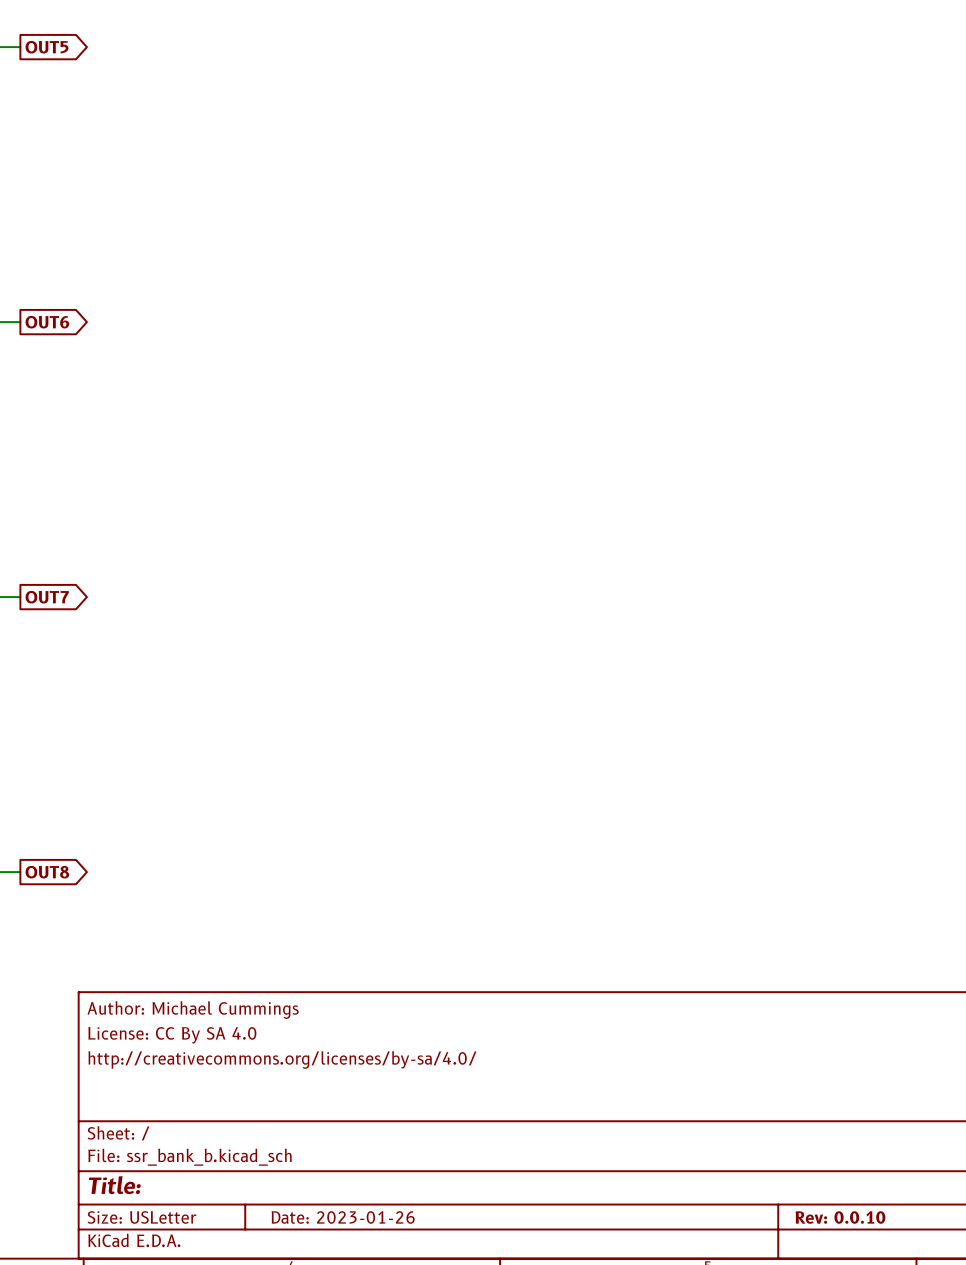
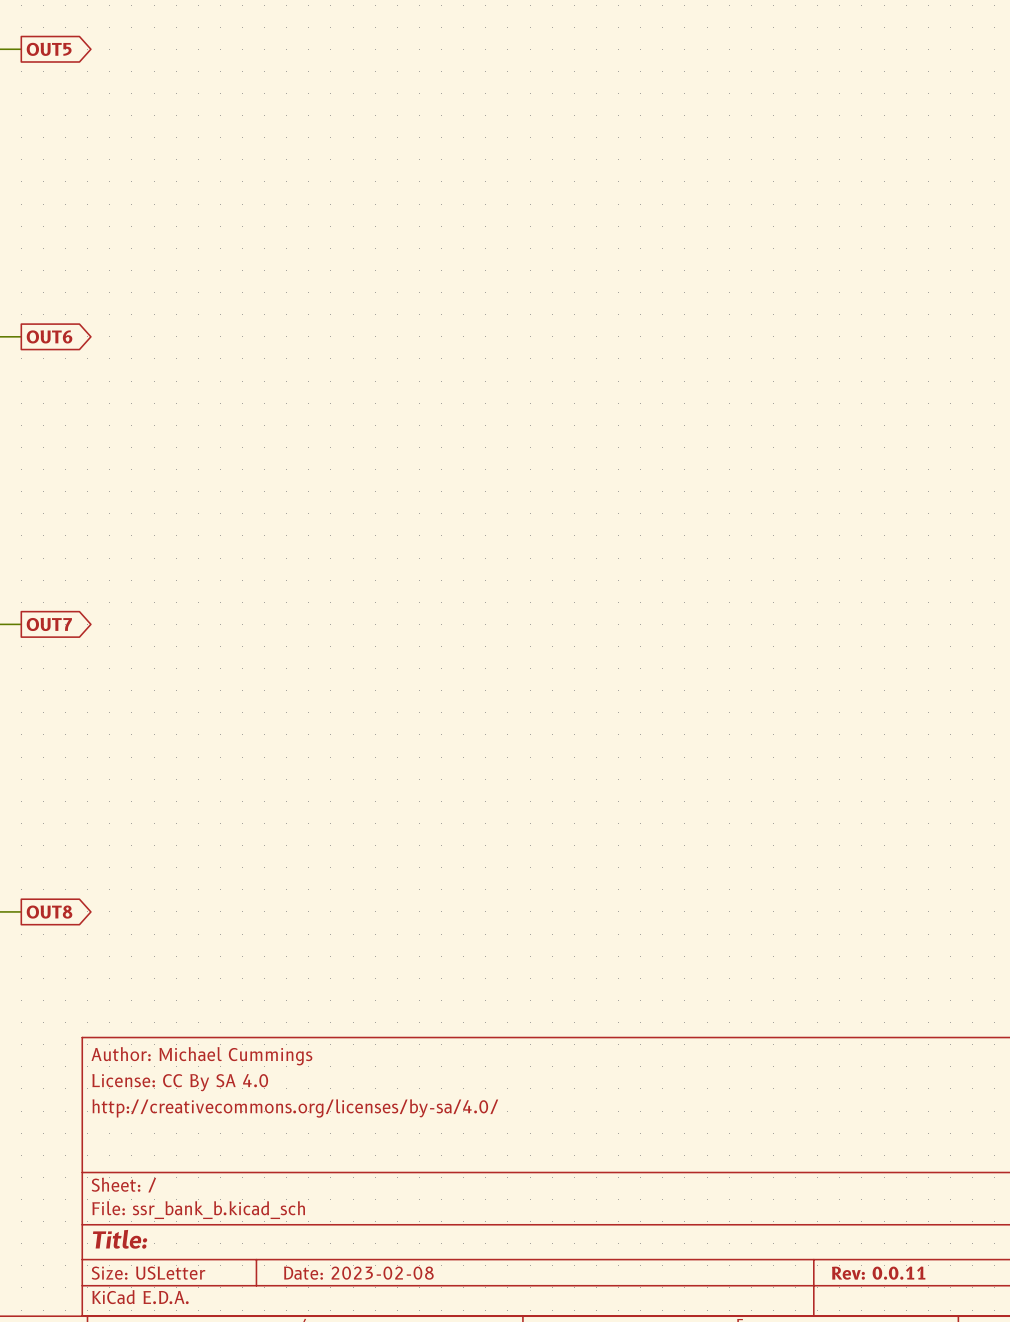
title block: Date: 2023-01-26 (343, 1217) -> Date: 2023-02-08 (358, 1273)
title block: Rev: 0.0.10 (840, 1217) -> Rev: 0.0.11 (878, 1273)

